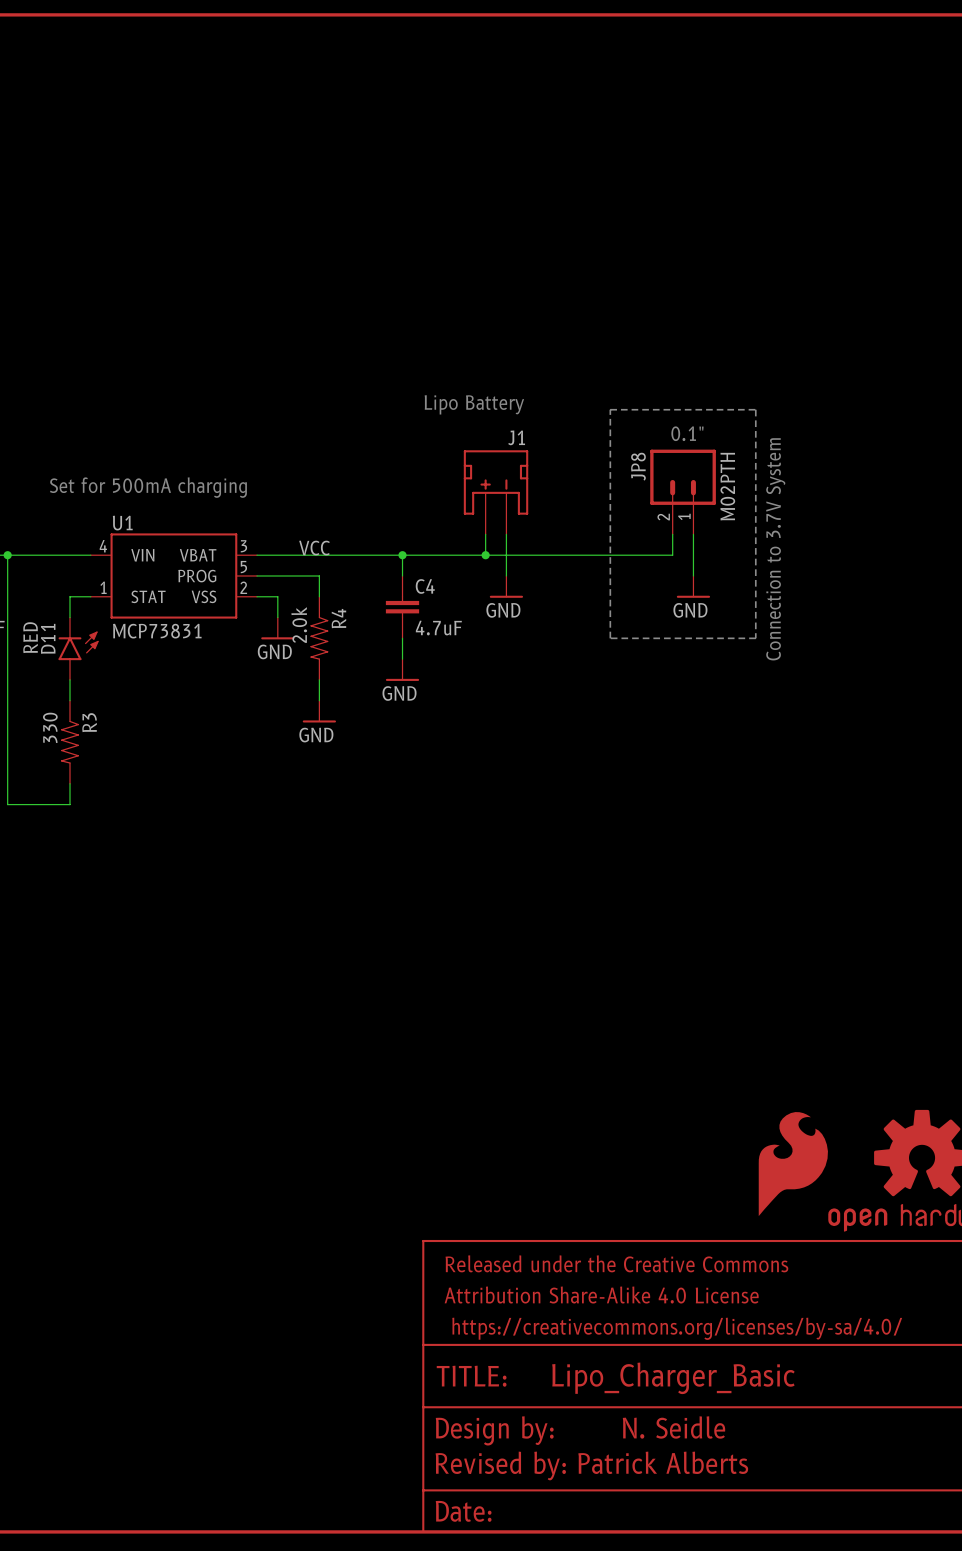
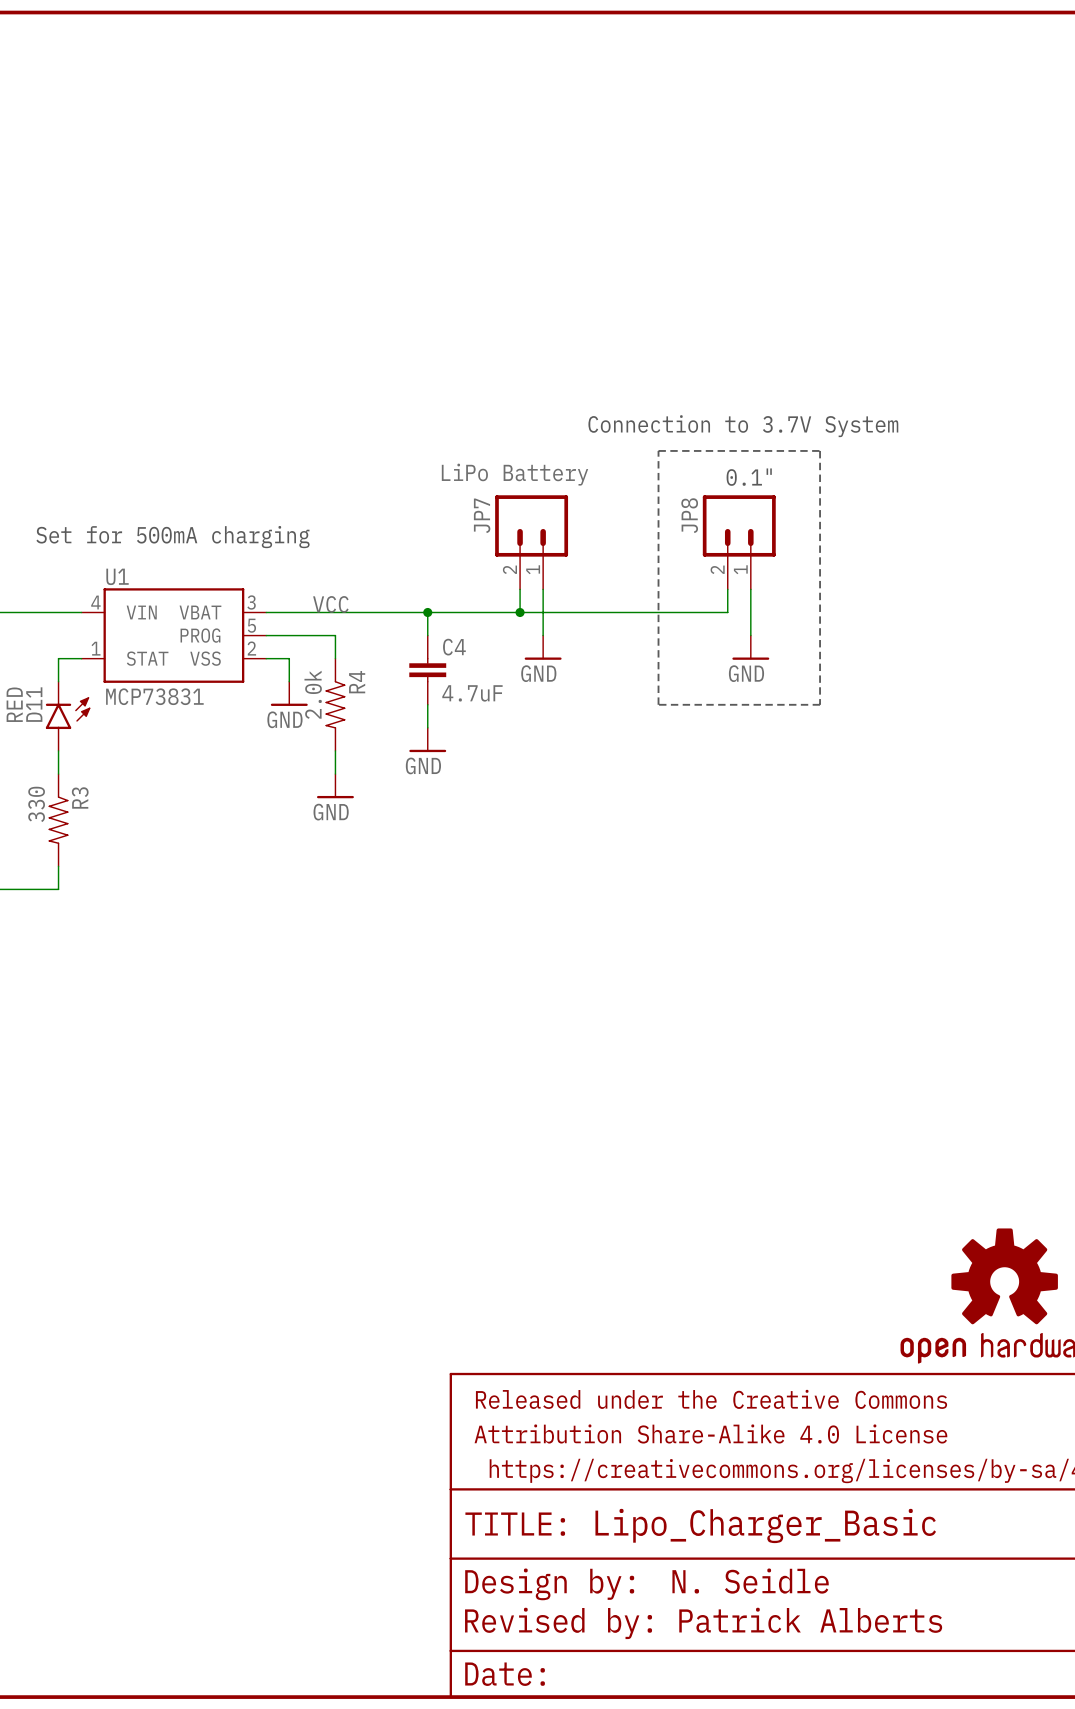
text: none -> Connection to 3.7V System (743, 426)
text: Lipo Battery (474, 404) -> none
JP8 value: M02PTH (727, 486) -> none
J1: (496, 492) -> none
JP7: none -> LiPo Battery (531, 542)
text: Connection to 3.7V System (775, 549) -> none
part: (793, 1164) -> none

